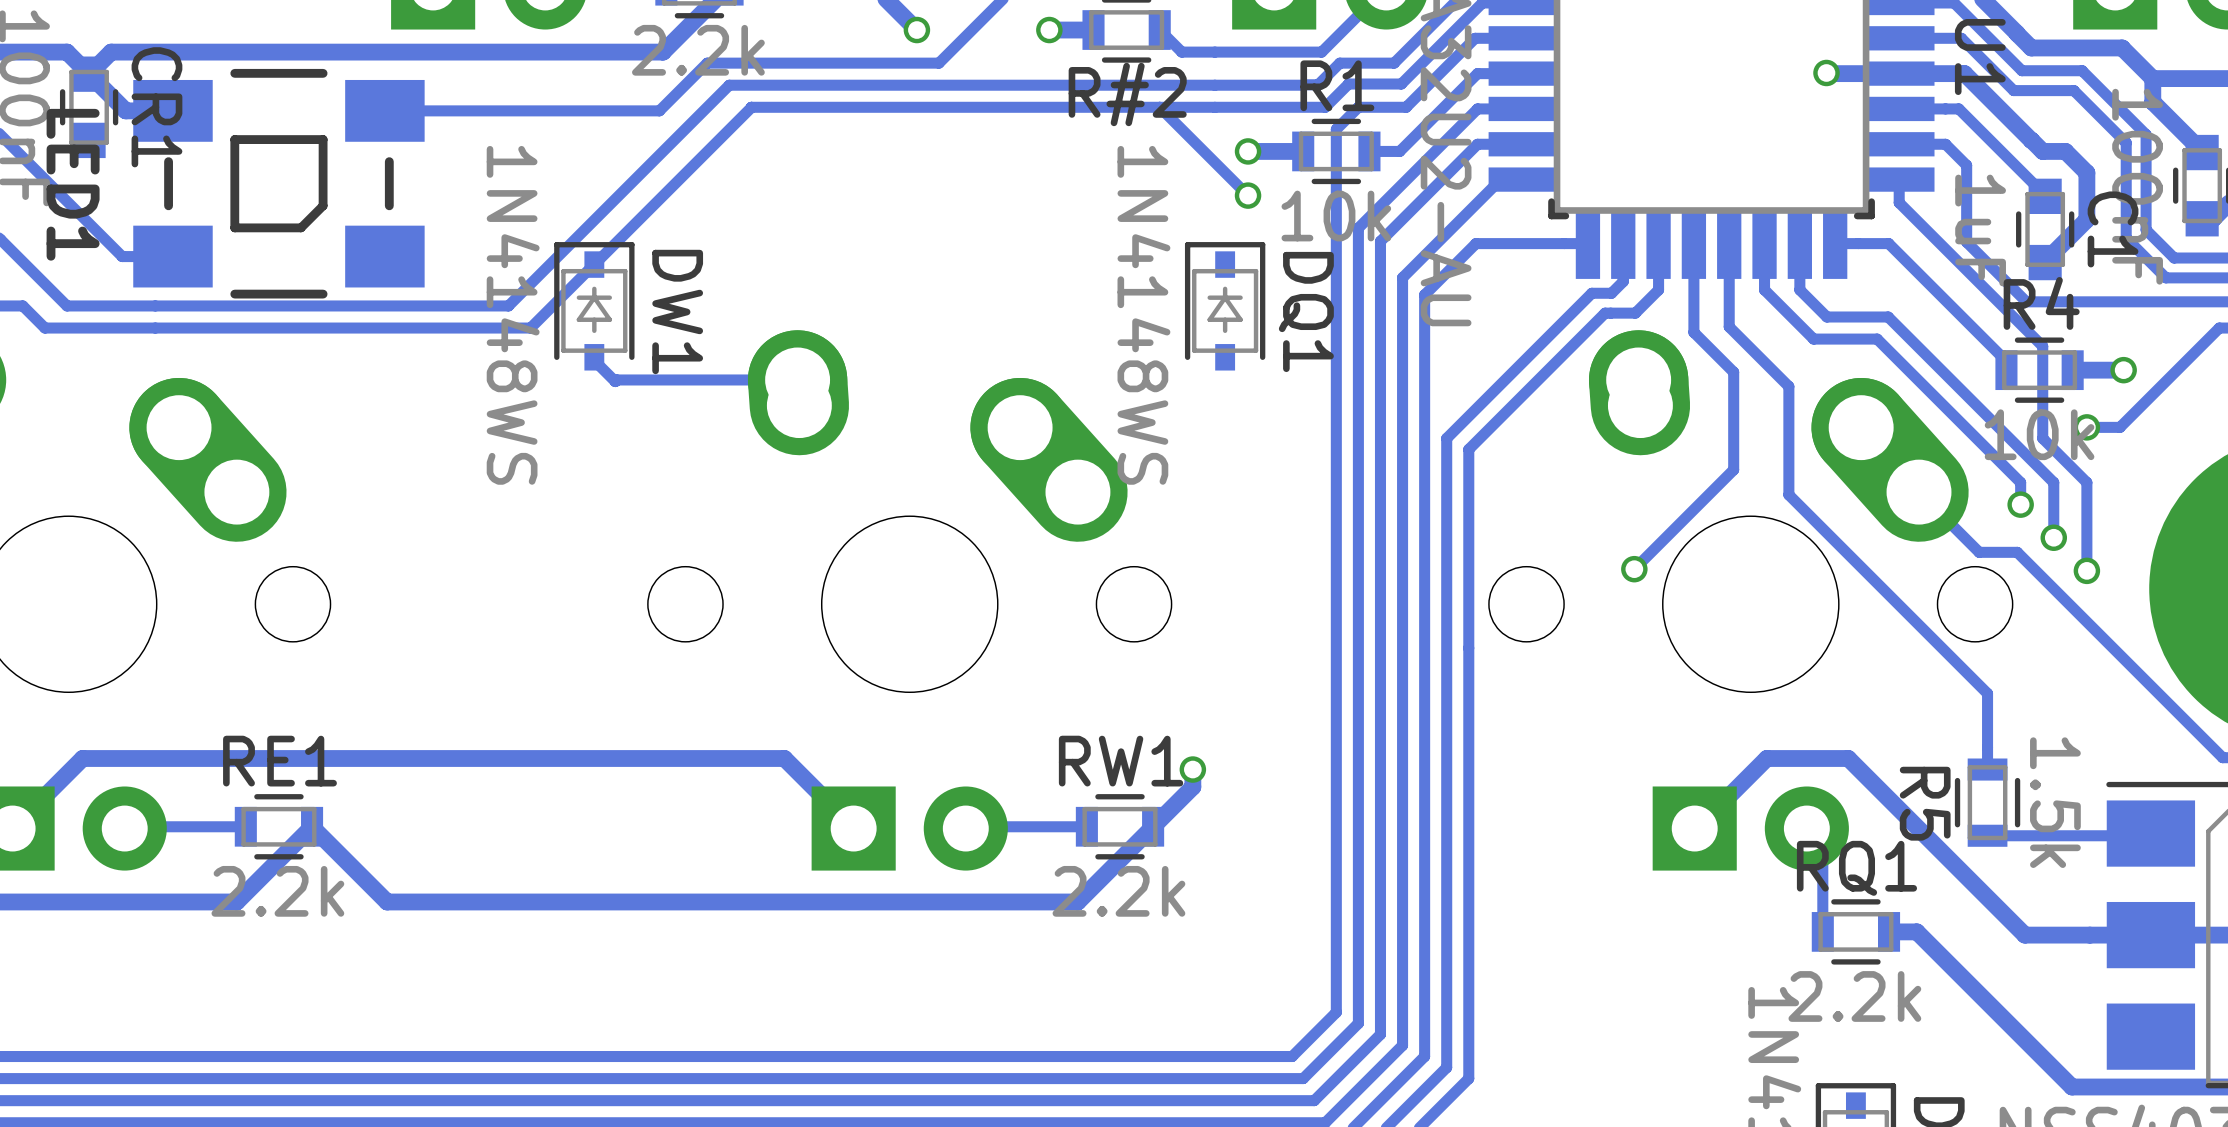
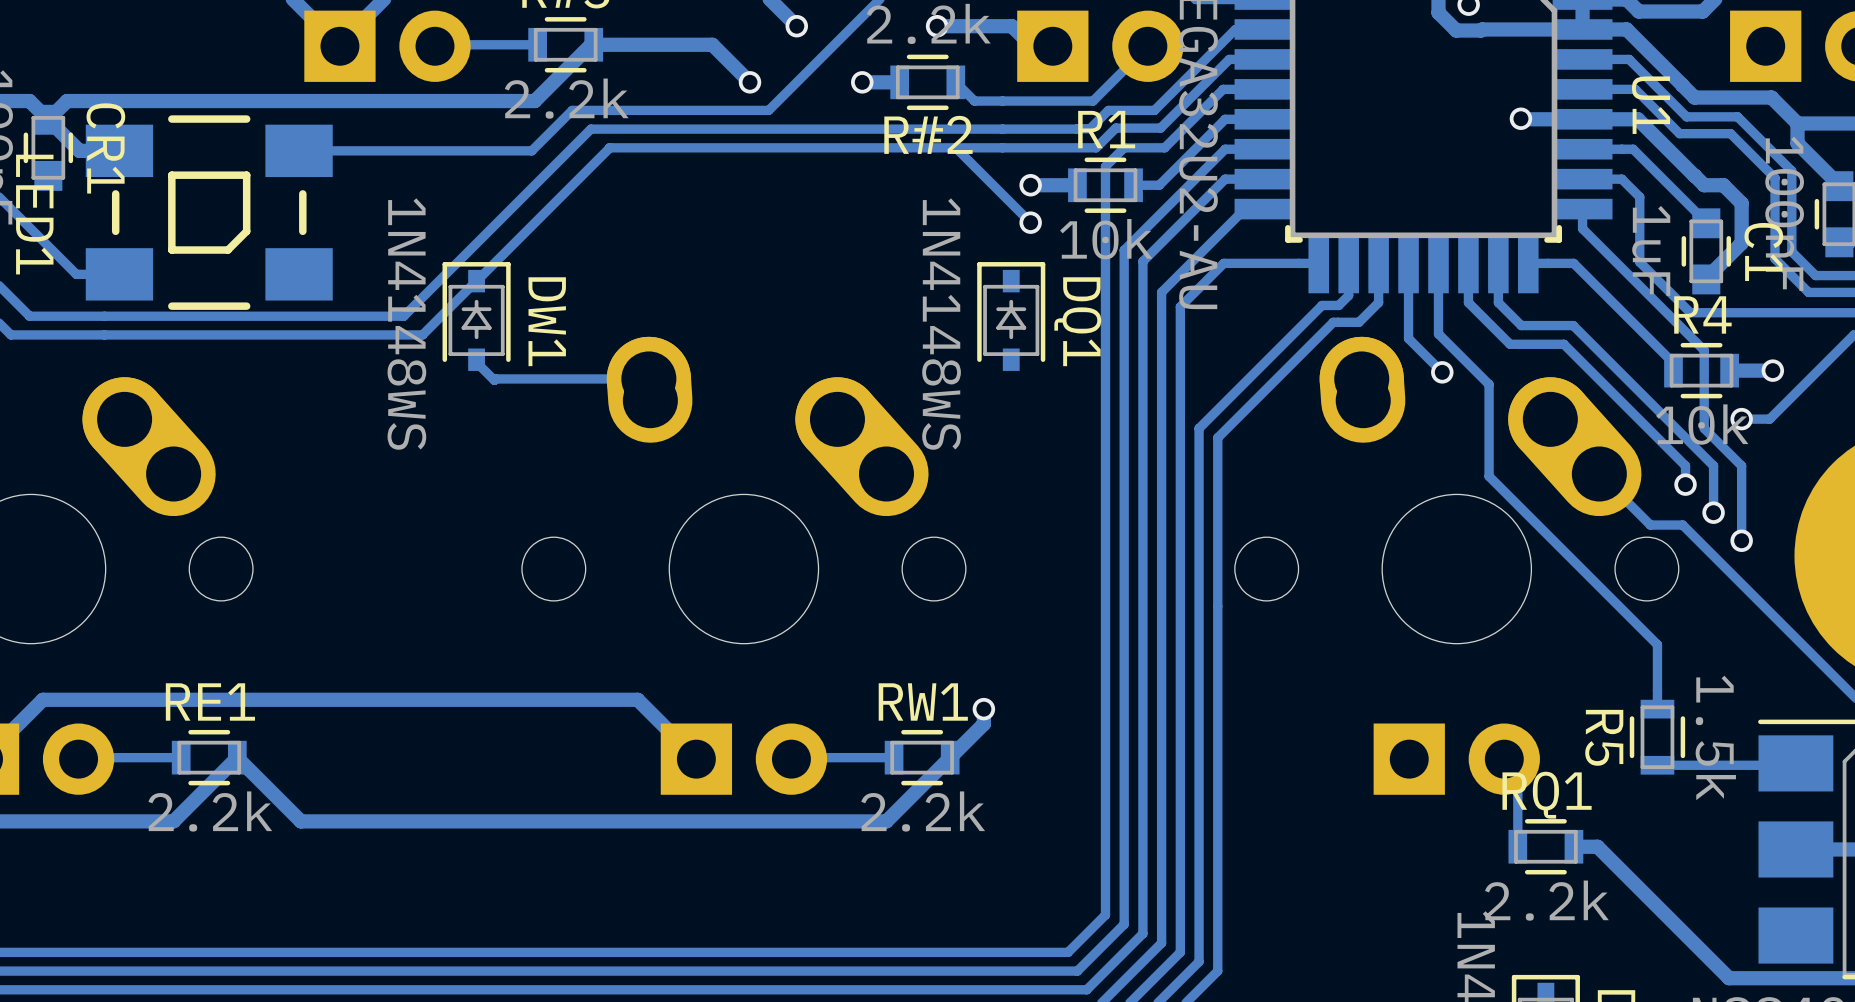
track: (1733, 372) (1733, 469) (1634, 569) -> none
via position: (1634, 569) -> (1442, 372)
track: (1694, 828) (1766, 758) (1848, 758) (2024, 935) (2150, 935) -> none

